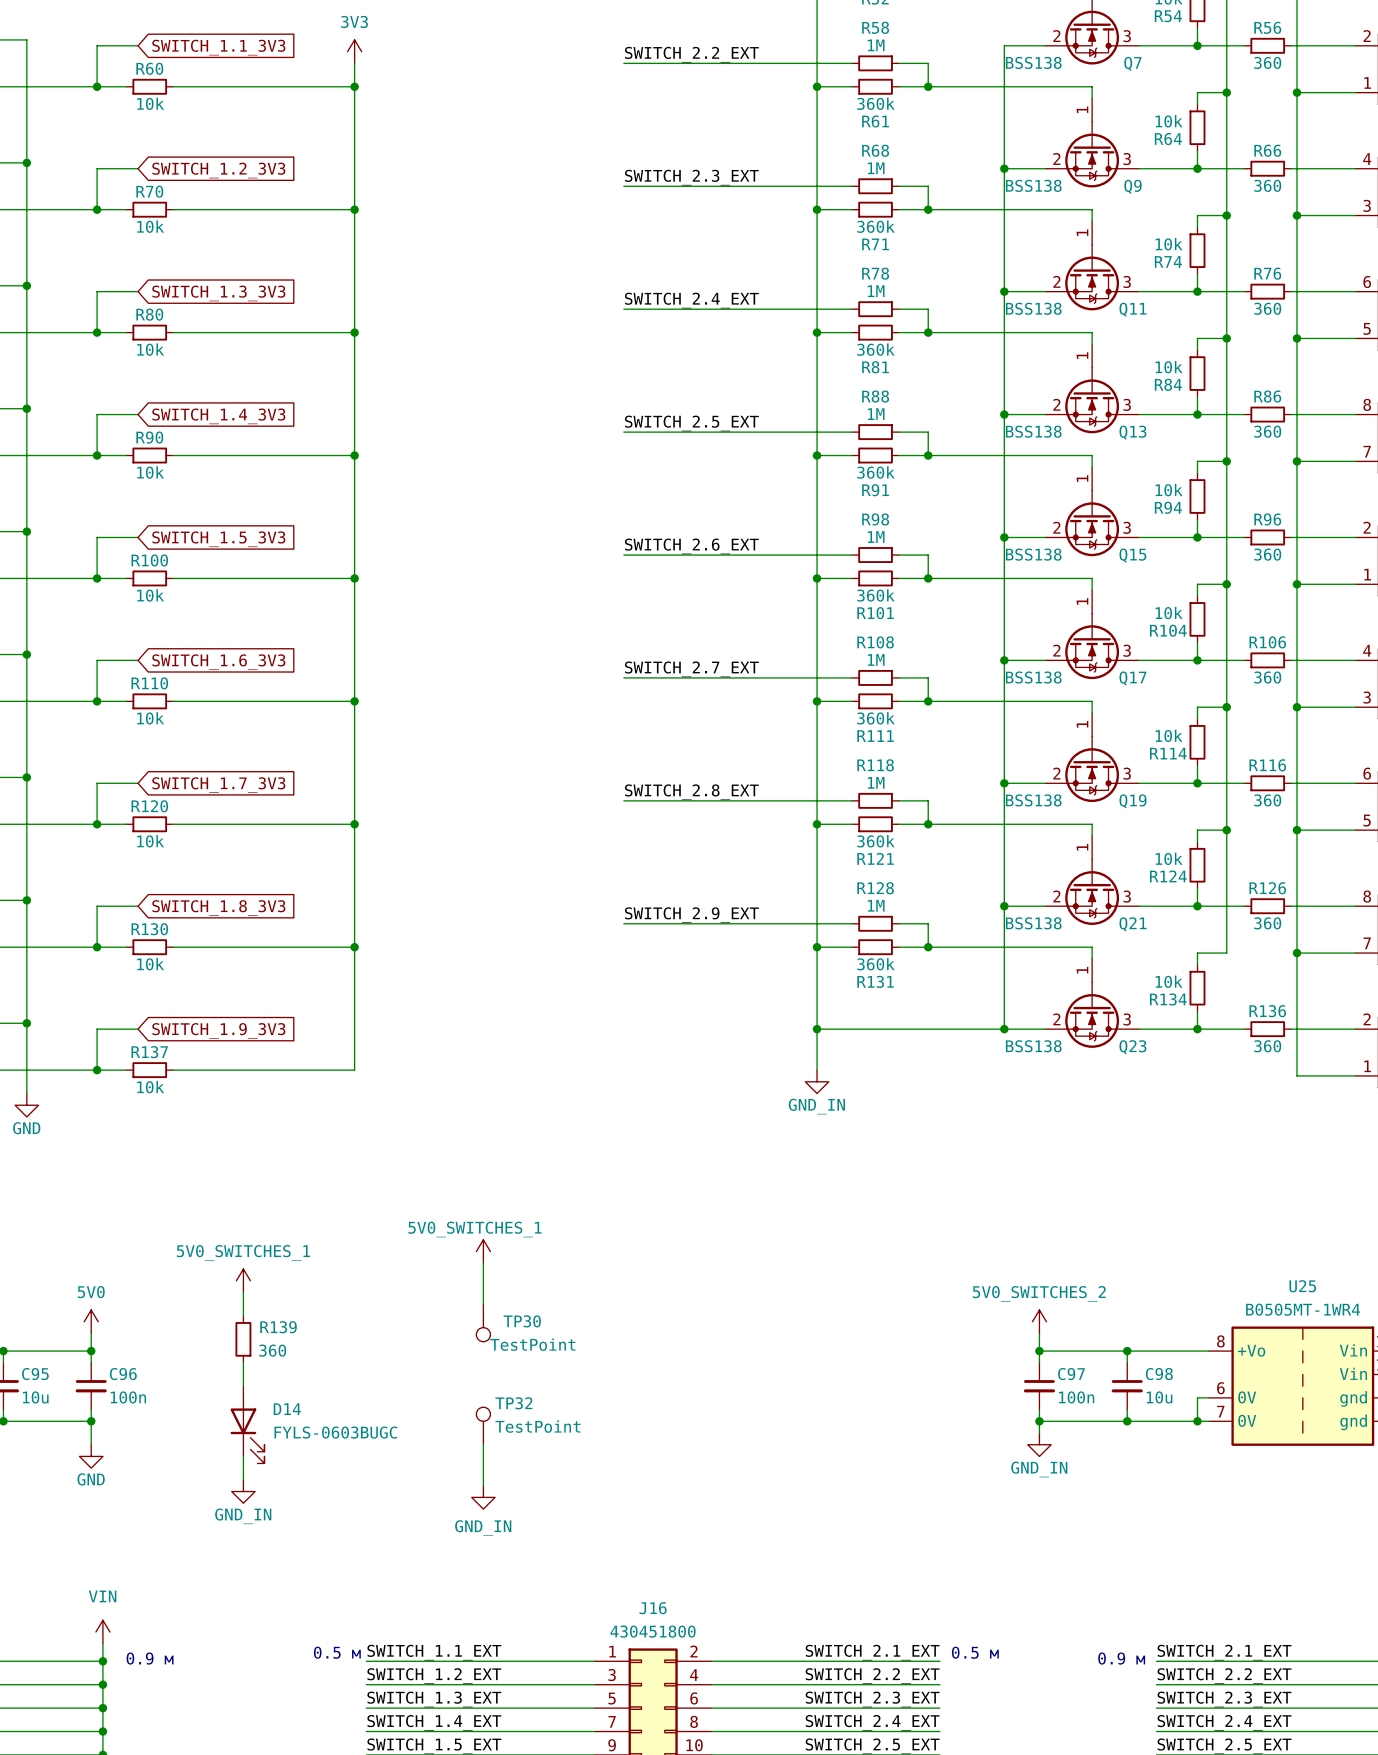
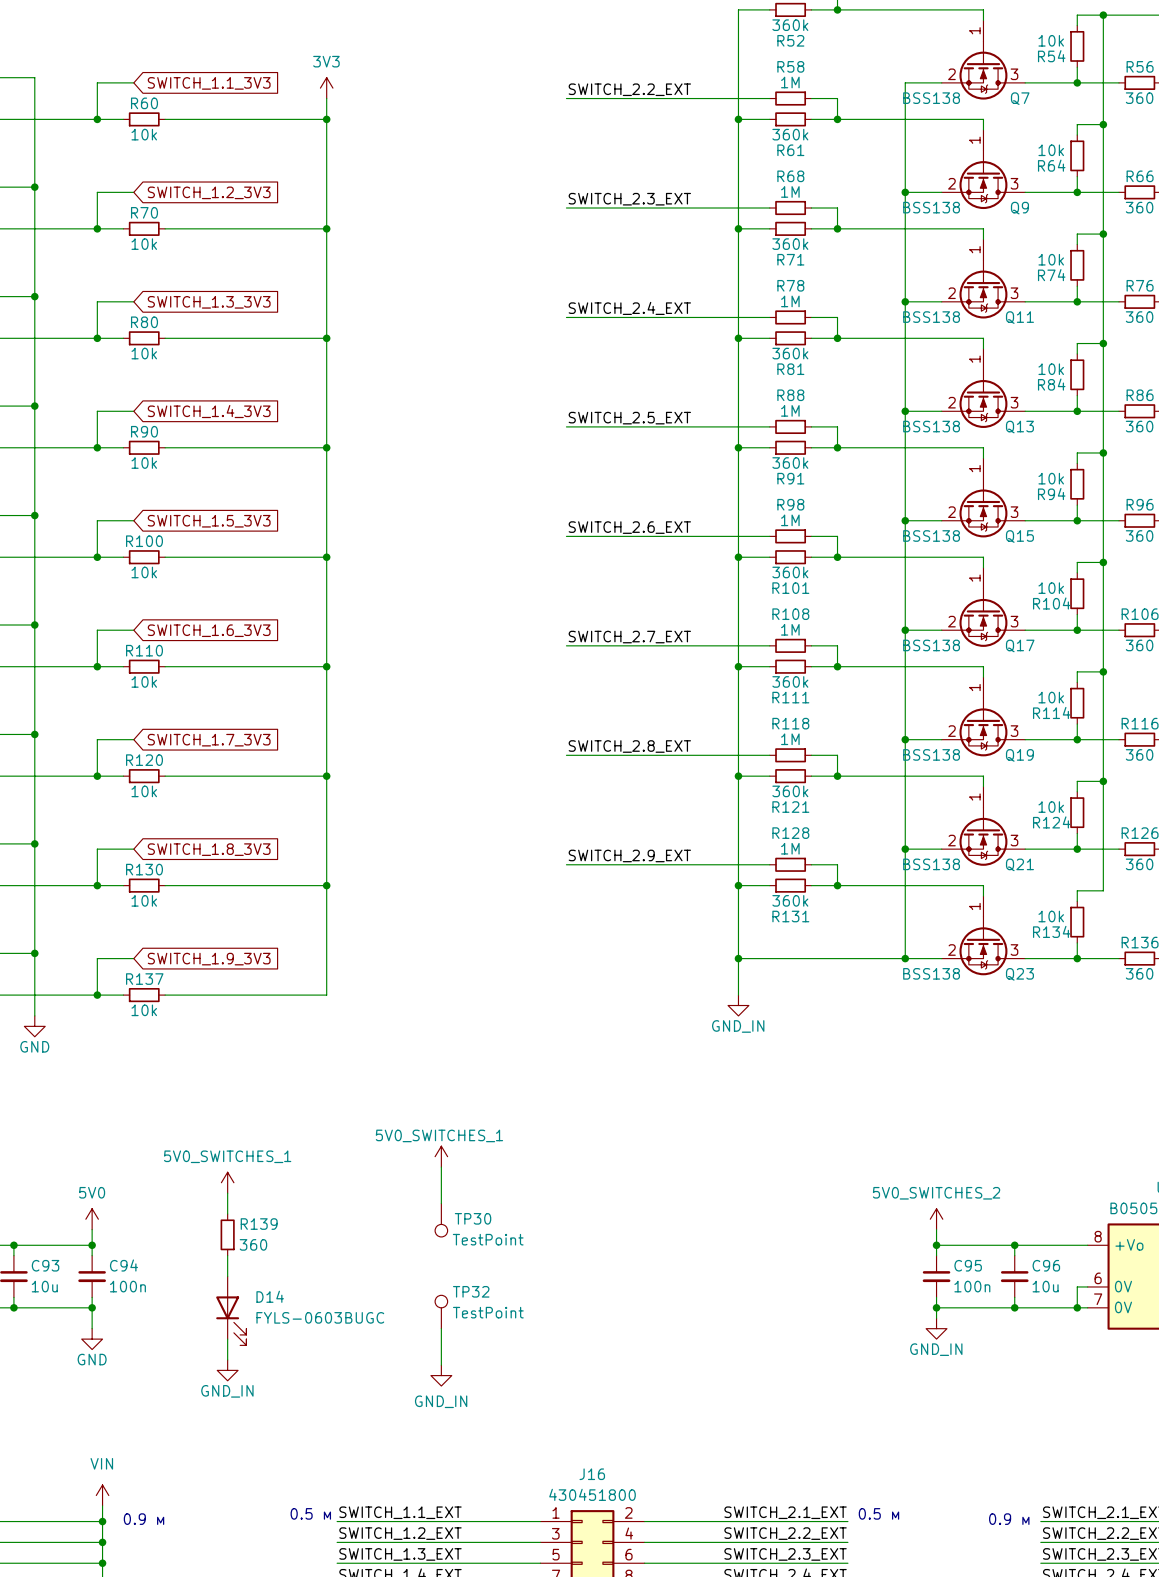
C95 name: C95 (35, 1374) -> C93 (45, 1265)
C96 name: C96 (123, 1374) -> C94 (123, 1265)
C97 name: C97 (1071, 1374) -> C95 (968, 1265)
C98 name: C98 (1159, 1374) -> C96 (1046, 1265)

